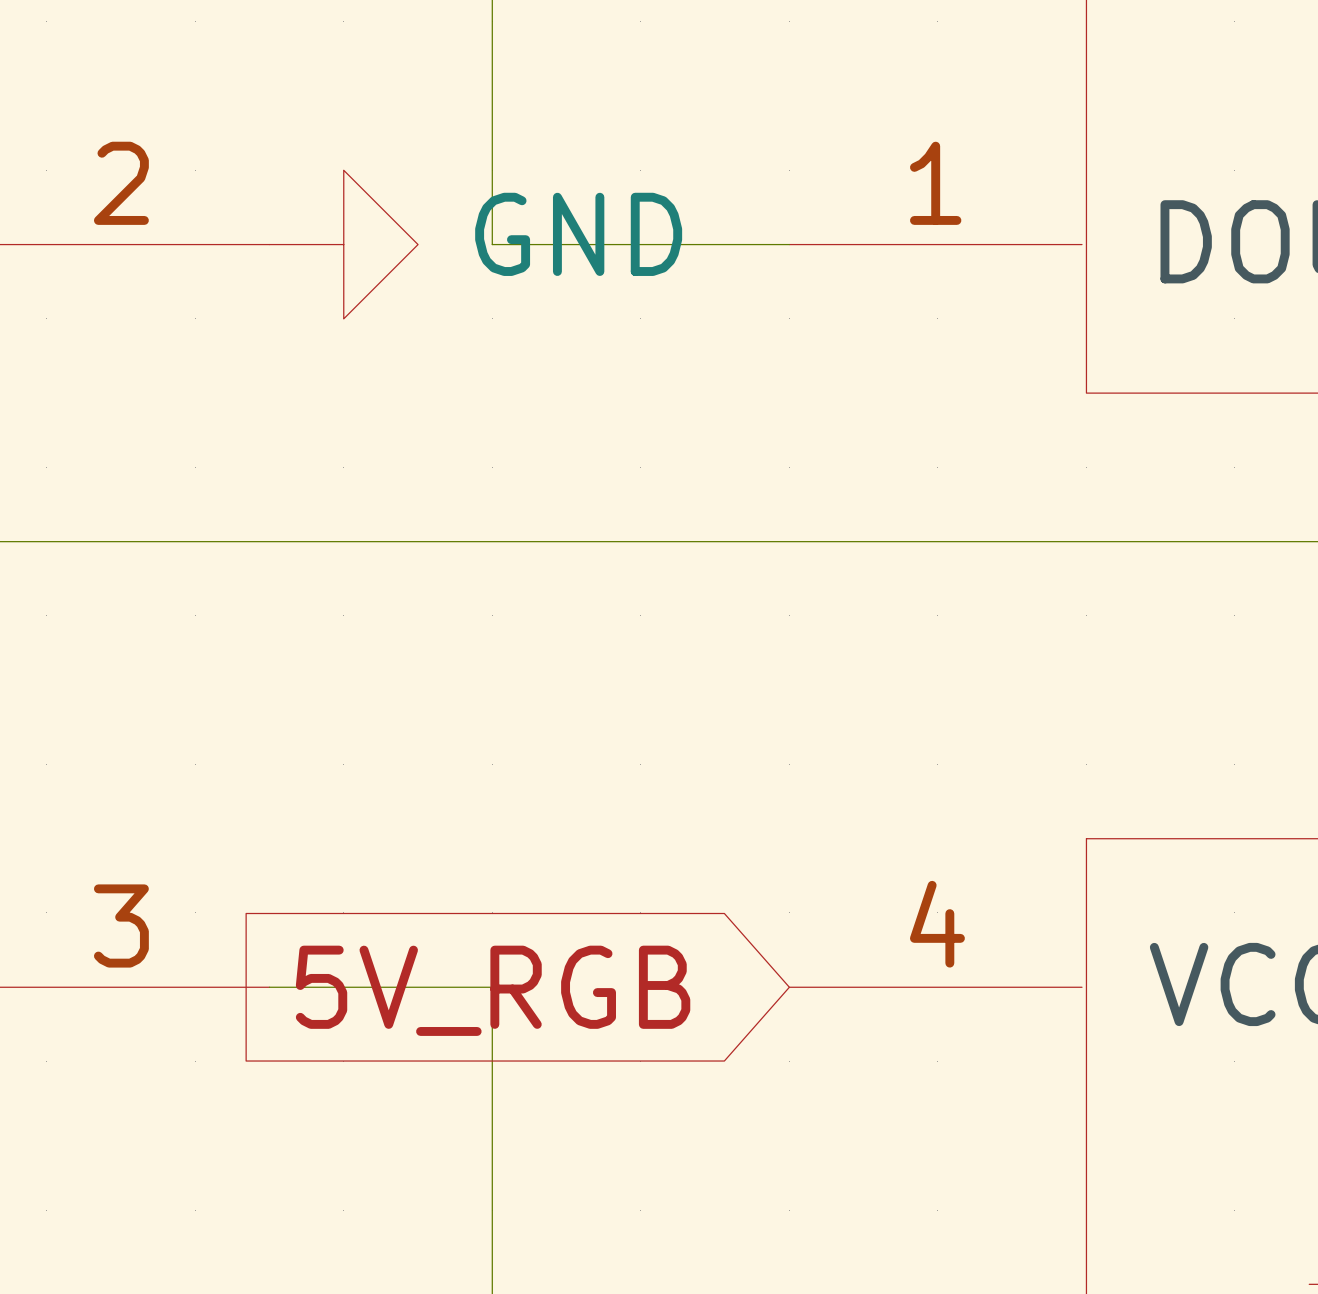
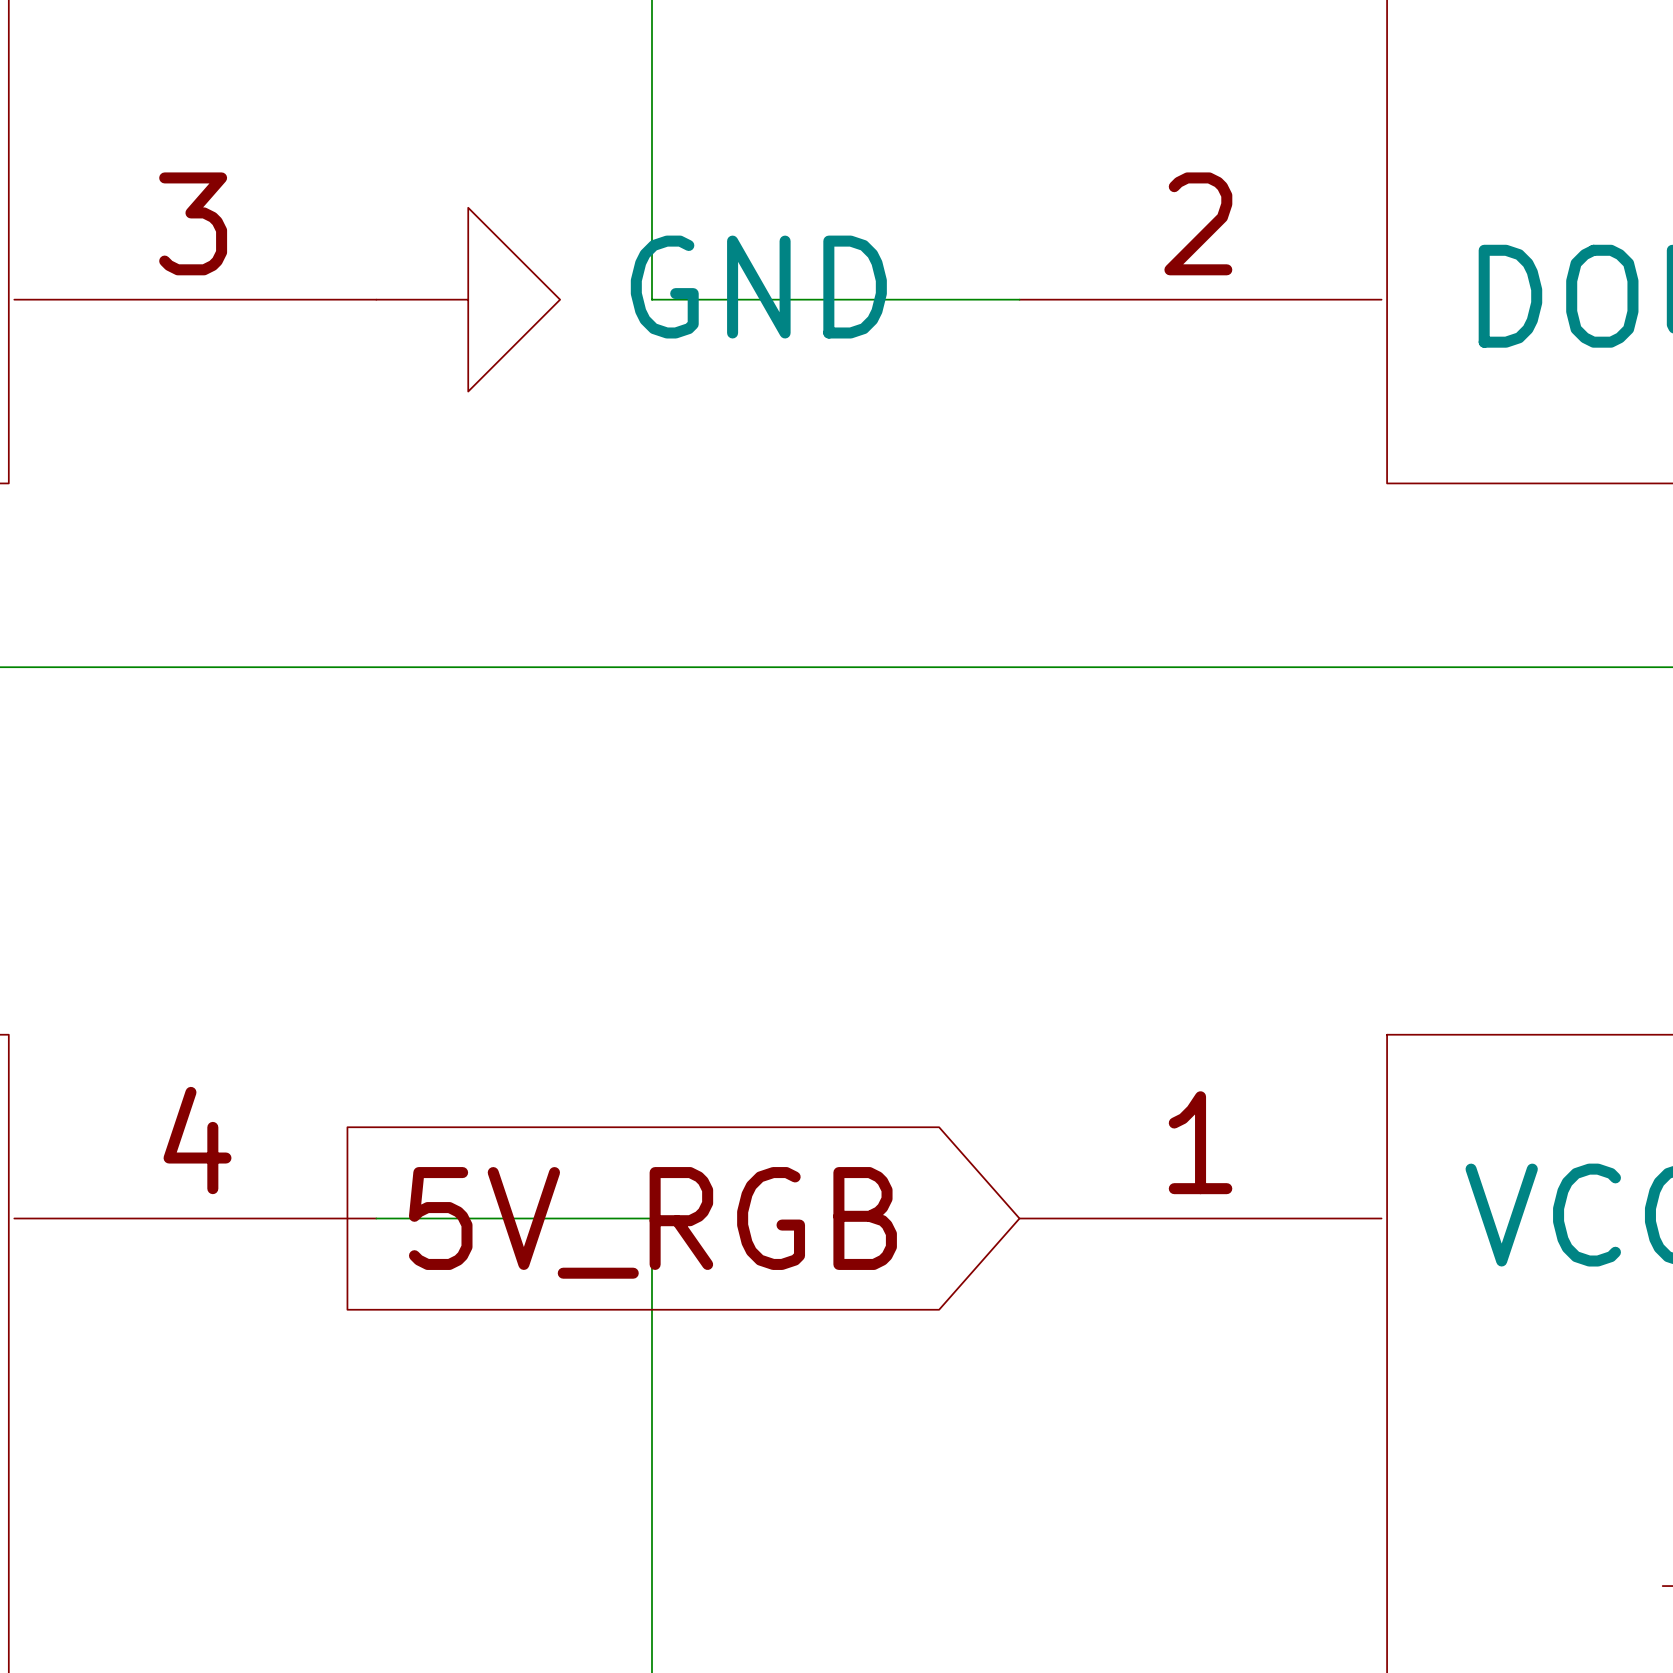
part pin number: 2 (121, 183) -> 3 (193, 223)
part pin number: 1 (935, 183) -> 2 (1198, 223)
part pin number: 4 (937, 924) -> 1 (1200, 1142)
part pin number: 3 (121, 925) -> 4 (197, 1140)

